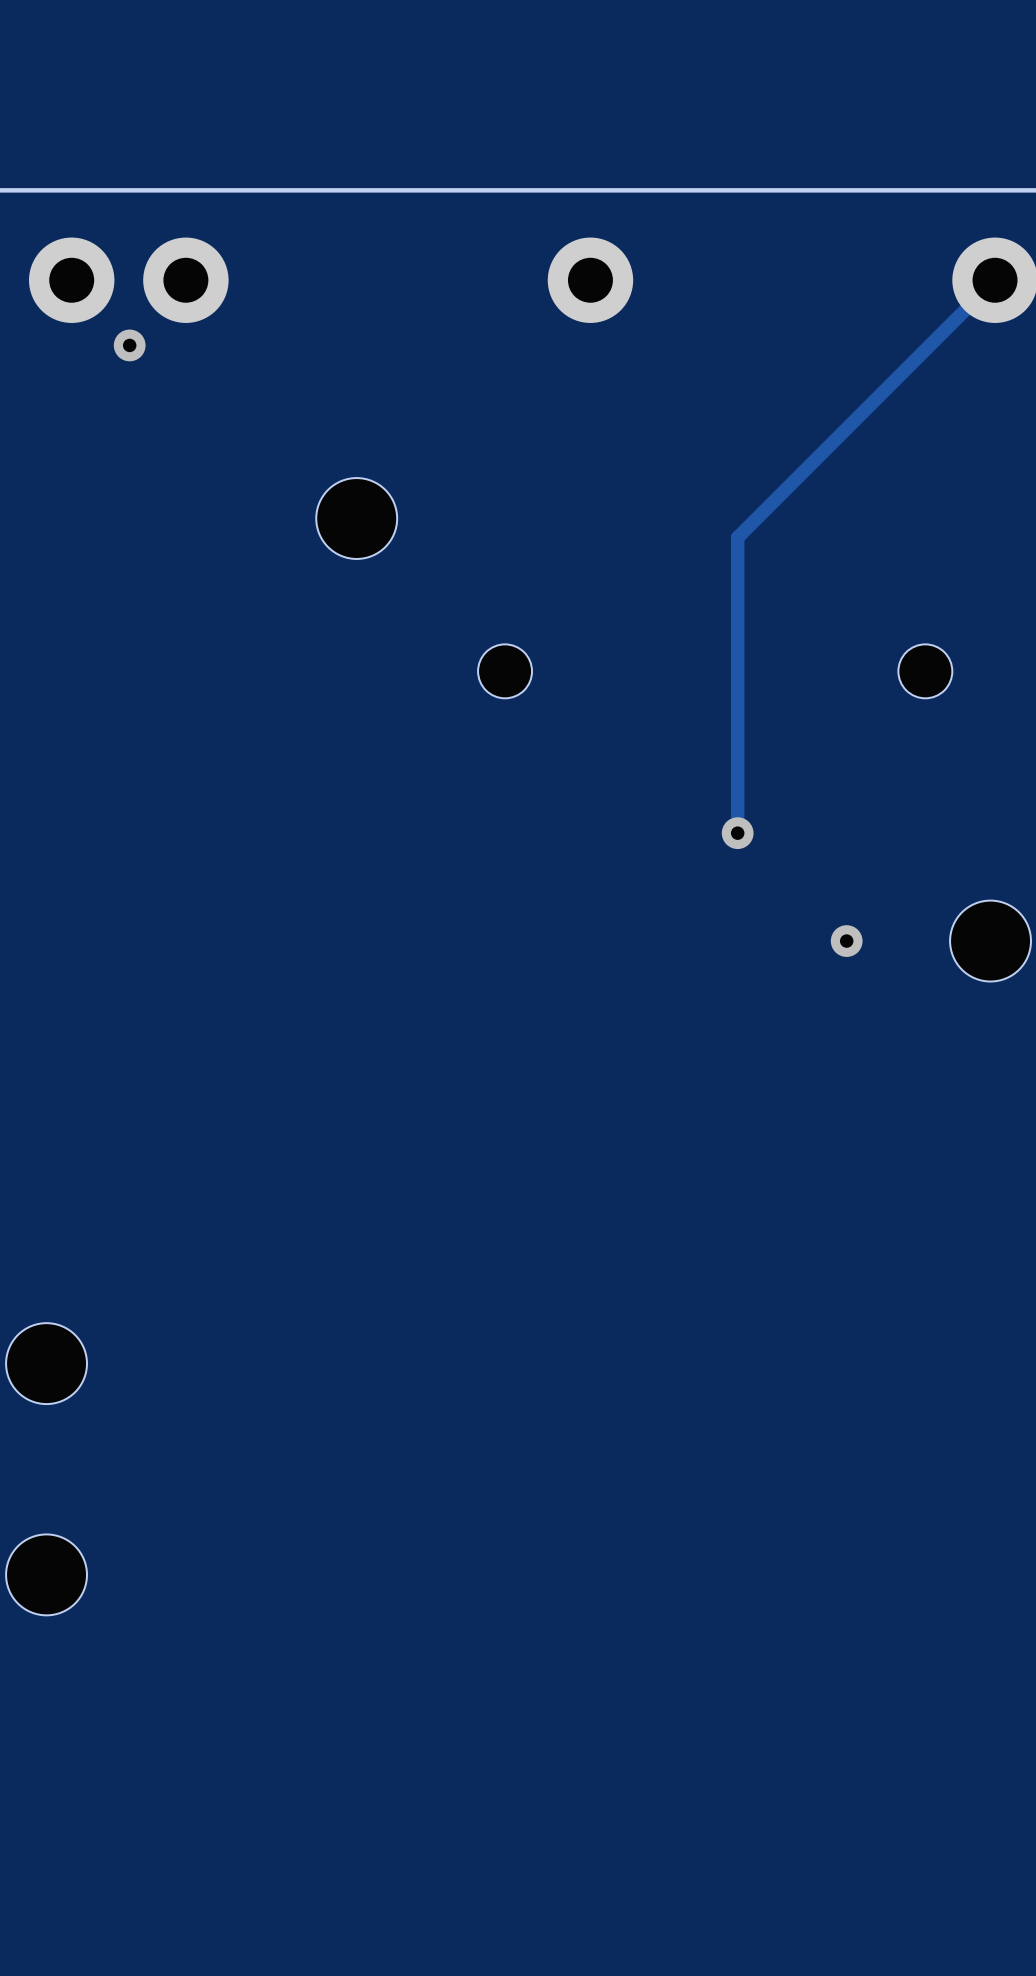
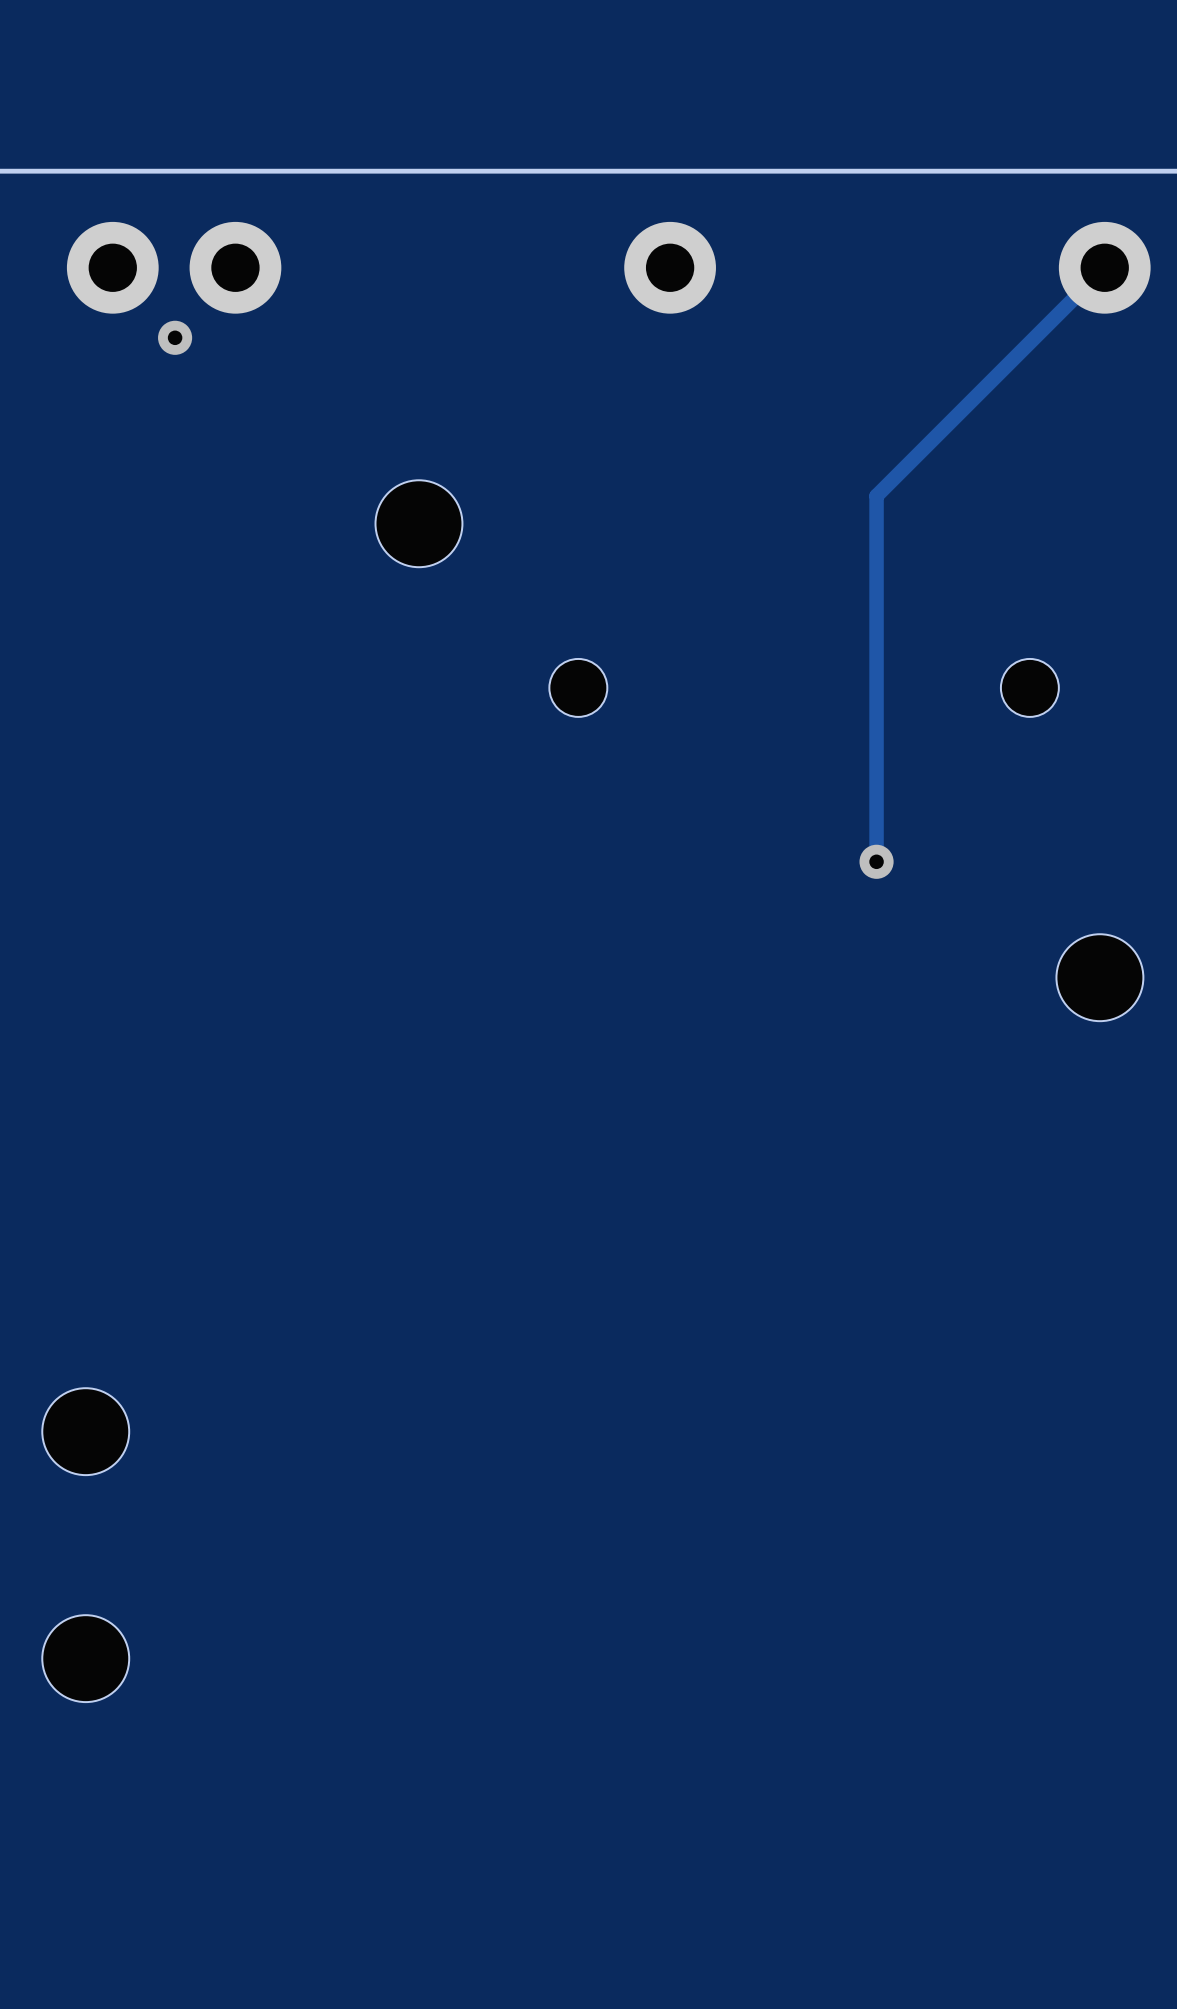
track: (782, 492) (737, 537) (737, 833) -> (876, 495) (876, 861)
via position: (737, 833) -> (876, 861)
via: (846, 941) -> none

